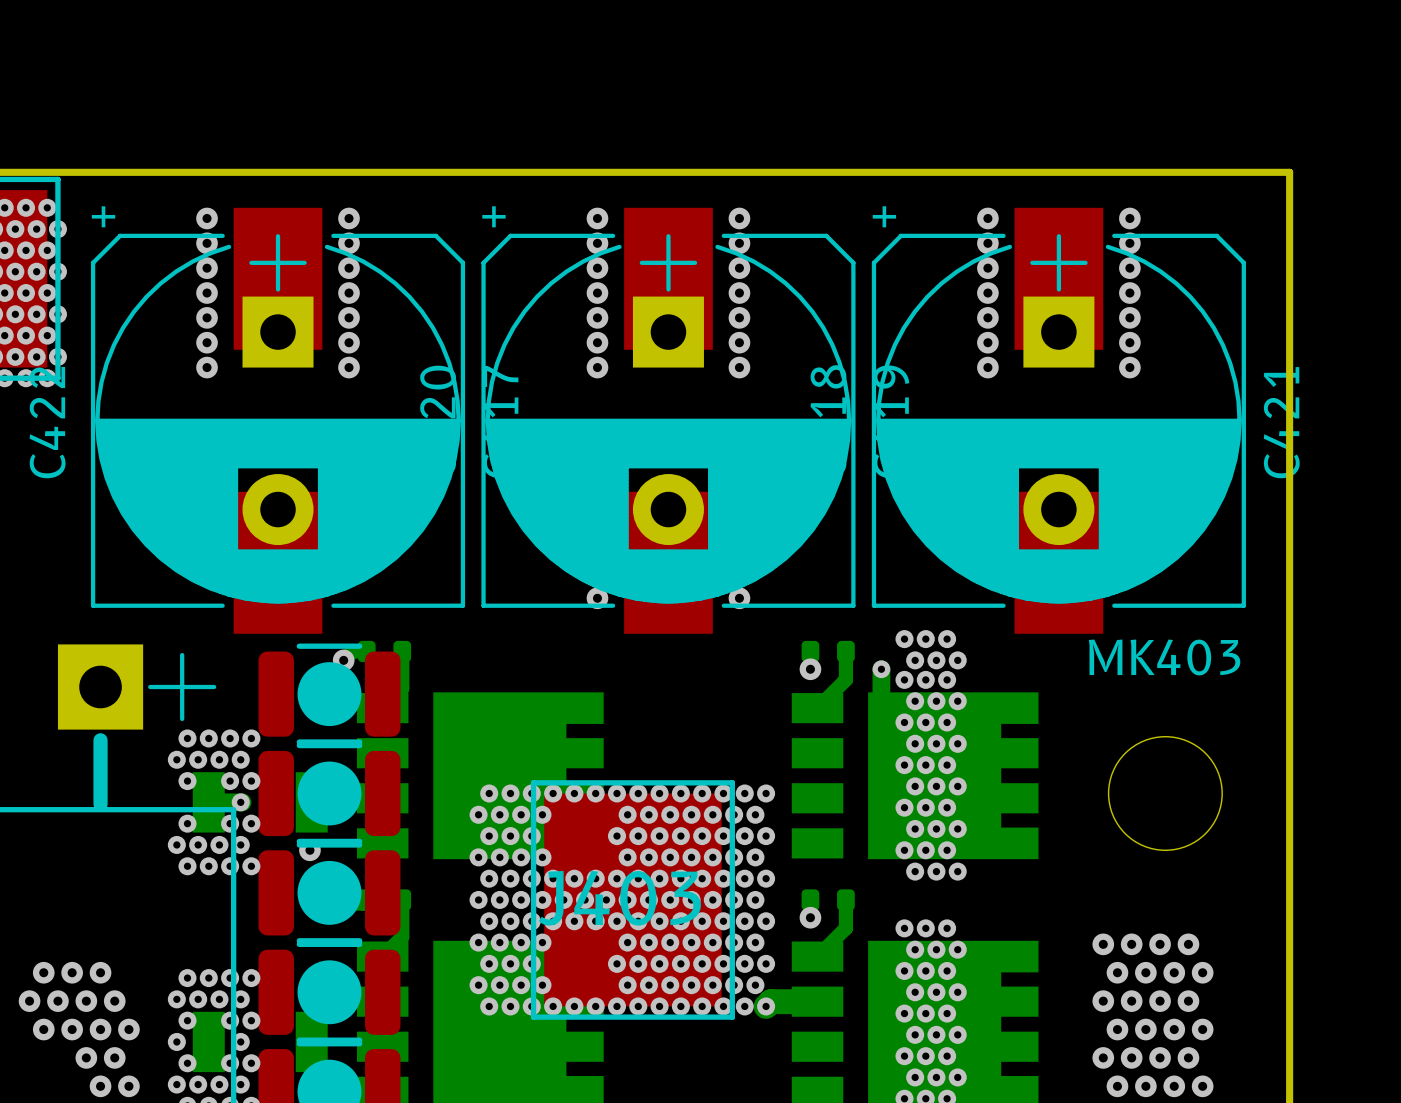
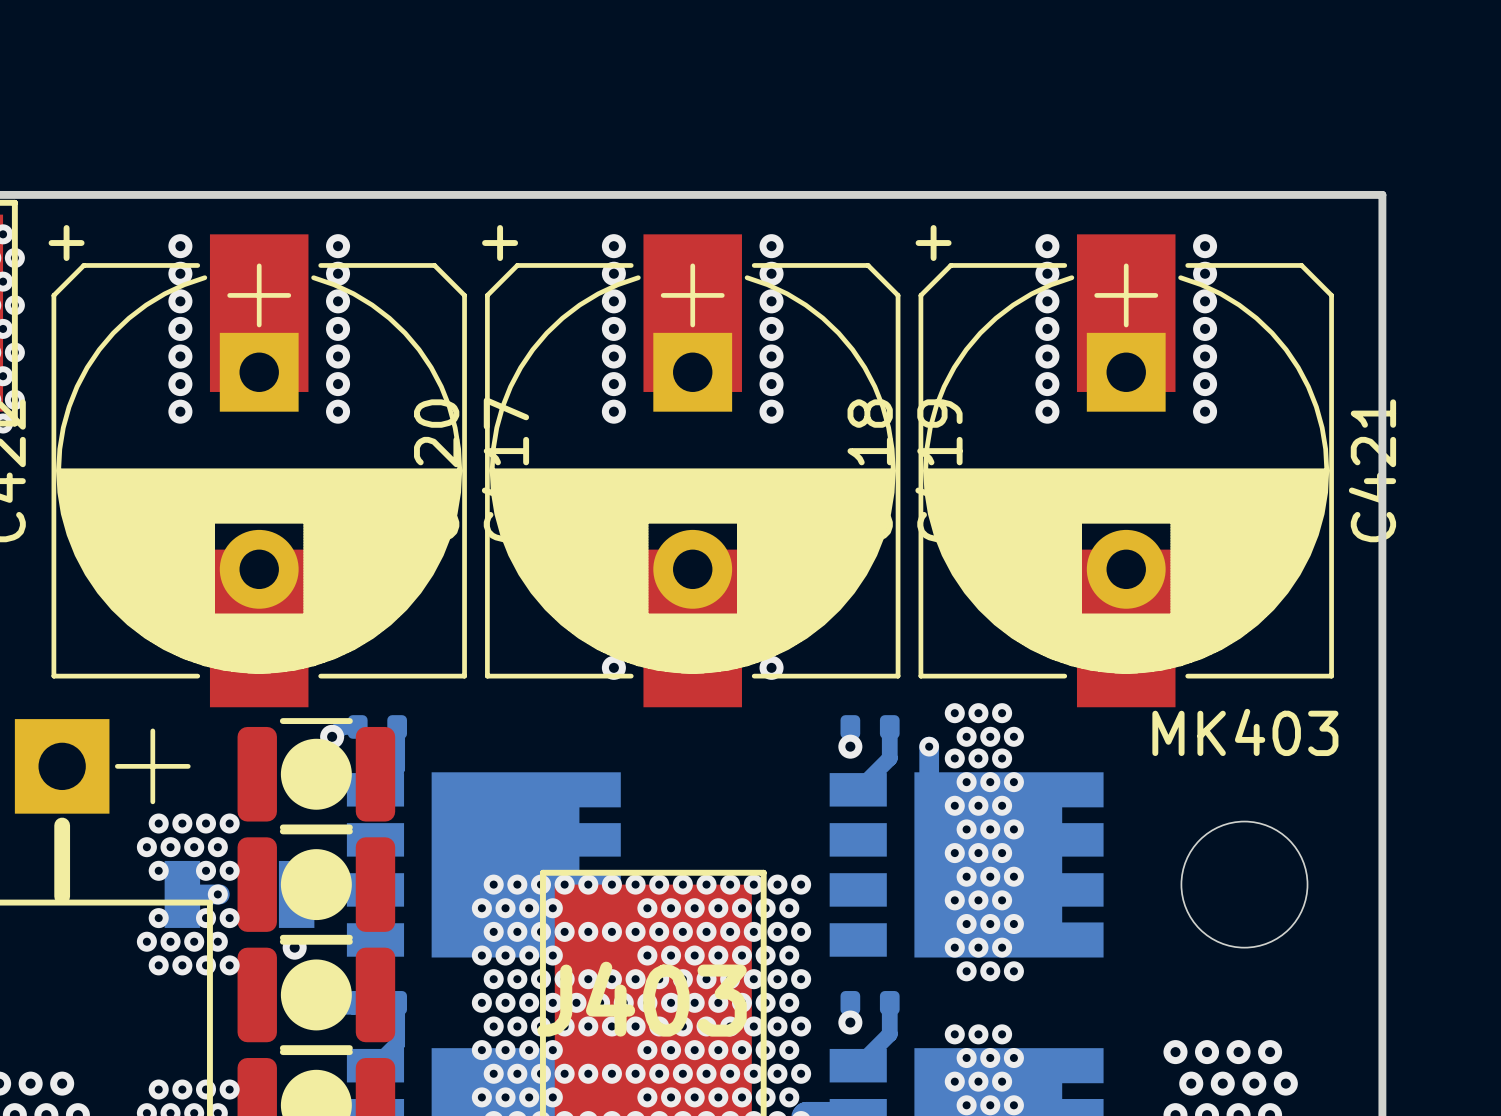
via: none -> (564, 931)
via: none -> (588, 931)
via: none -> (611, 931)
via: none -> (564, 1073)
via: none -> (588, 1073)
via: none -> (611, 1073)

